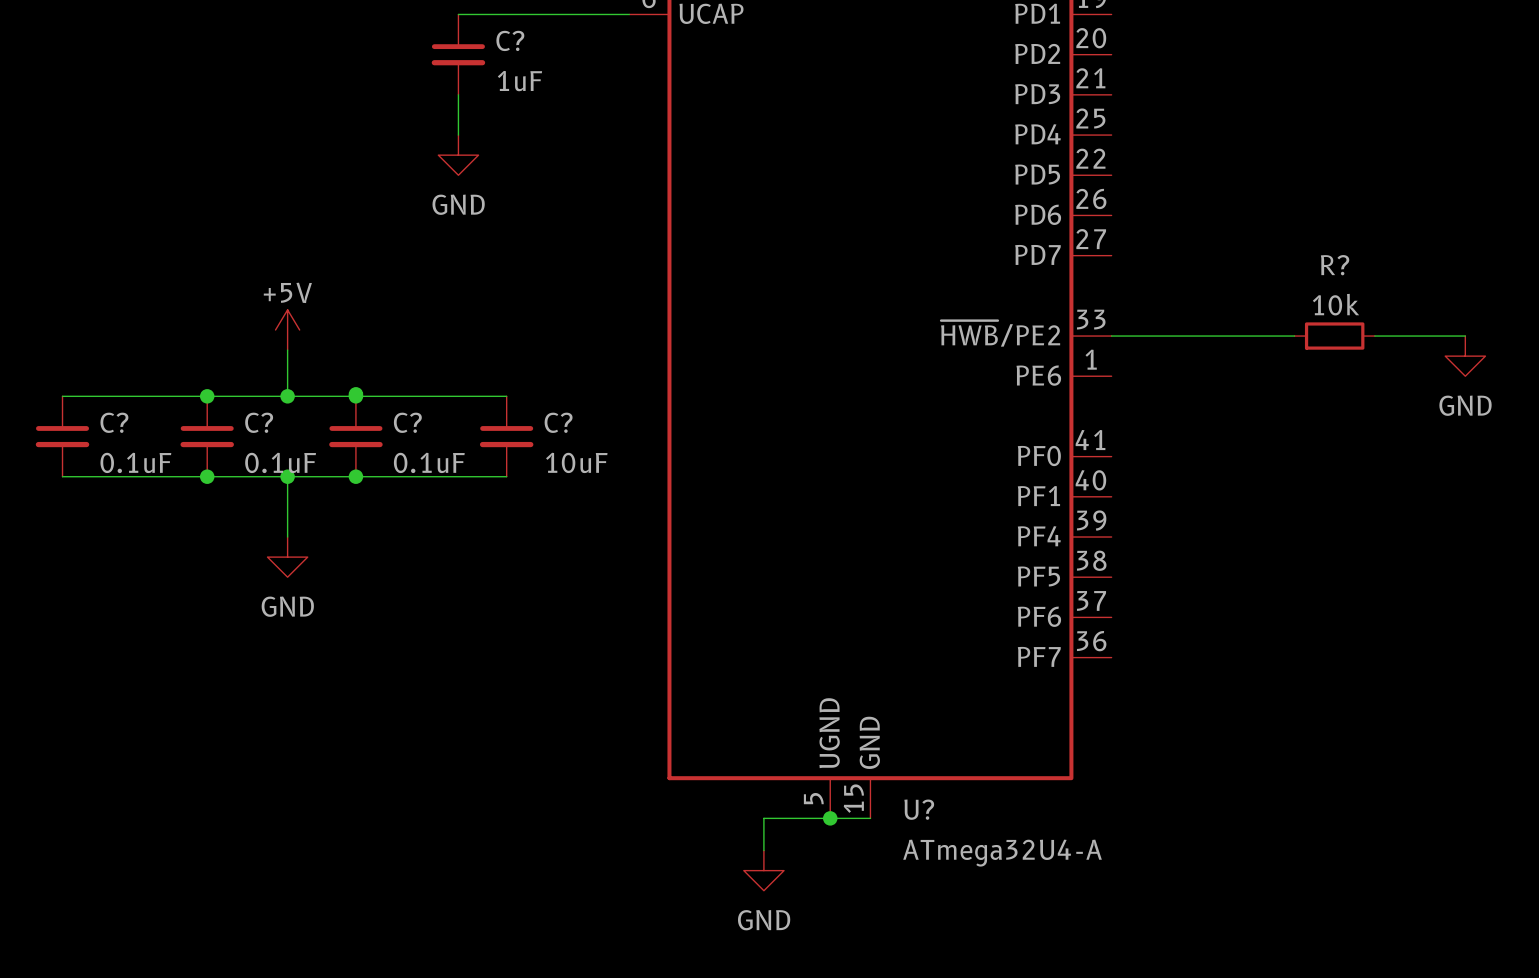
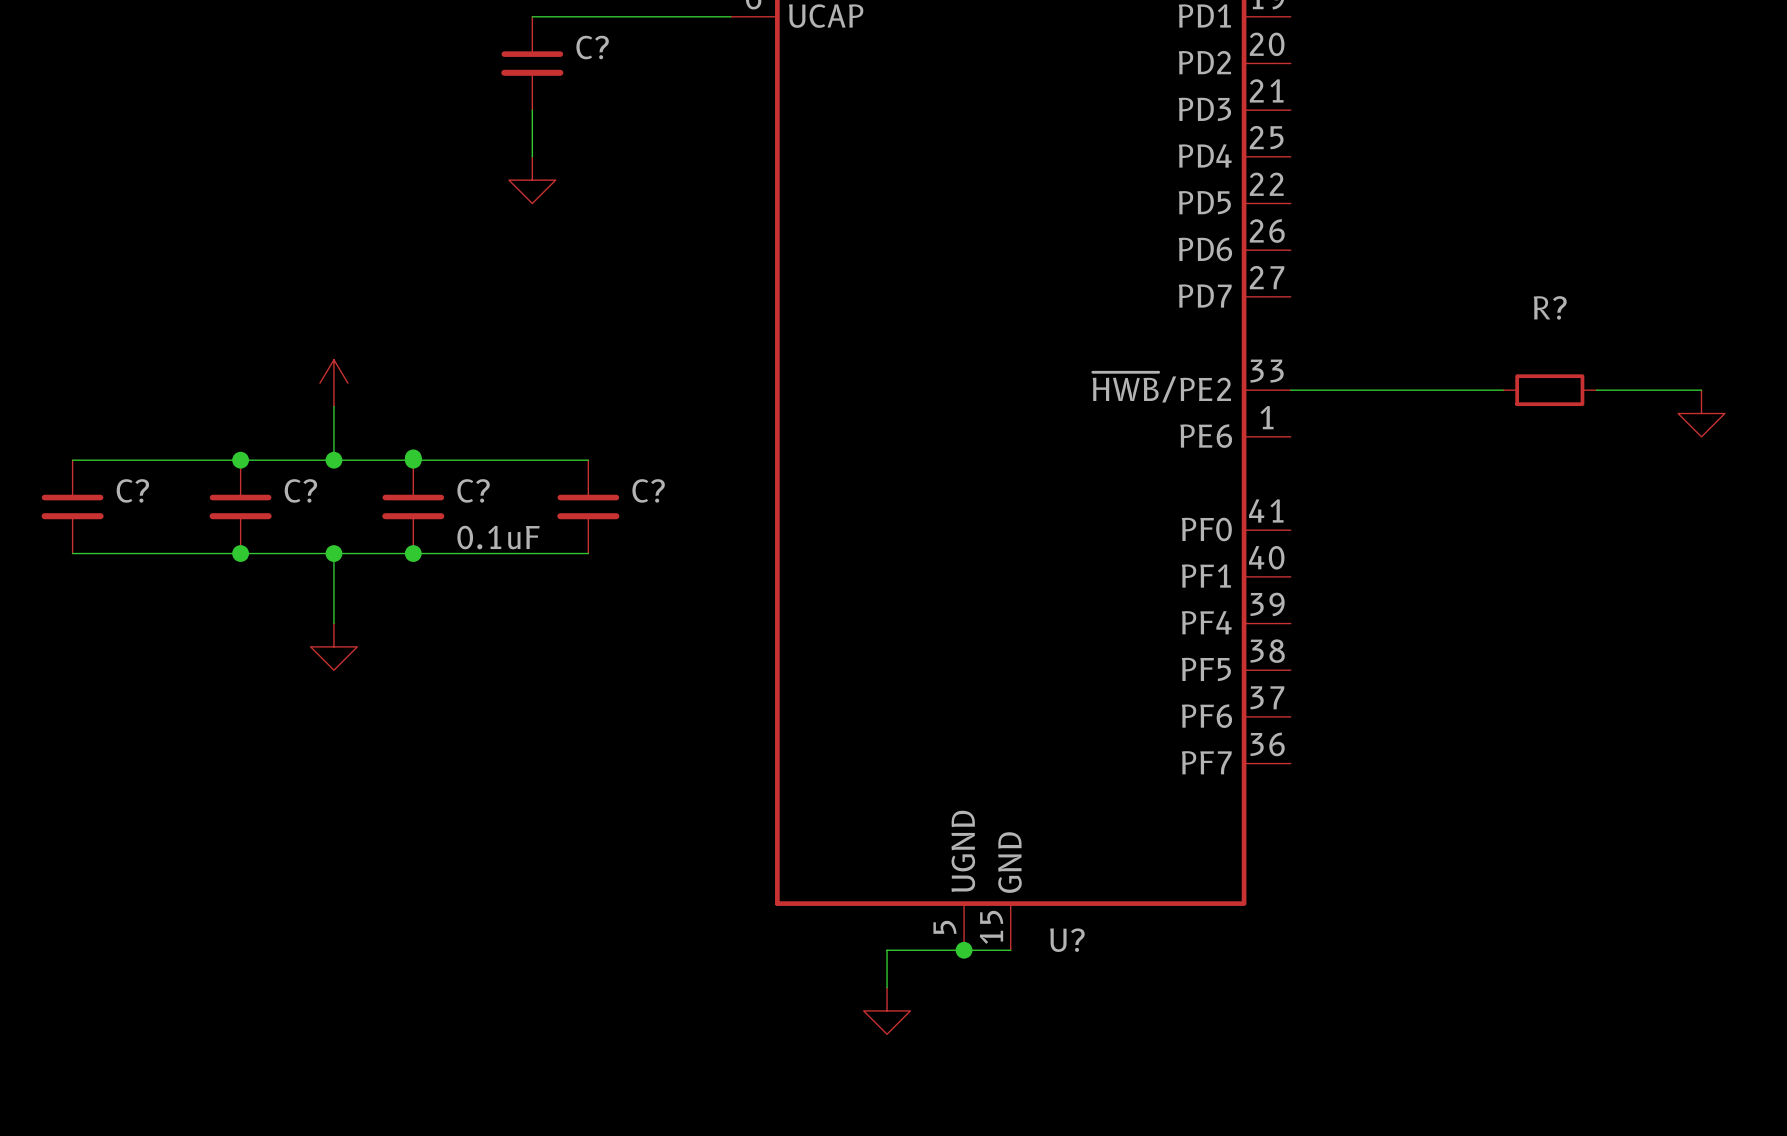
C? value: 1uF (519, 81) -> none
power symbol text: GND (458, 204) -> none
power symbol text: +5V (287, 292) -> none
R? value: 10k (1335, 304) -> none
power symbol text: GND (1465, 405) -> none
C? value: 0.1uF (135, 462) -> none
C? value: 0.1uF (280, 462) -> none
C? value: 10uF (576, 462) -> none
power symbol text: GND (287, 606) -> none
U? value: ATmega32U4-A (1002, 853) -> none
power symbol text: GND (764, 920) -> none

